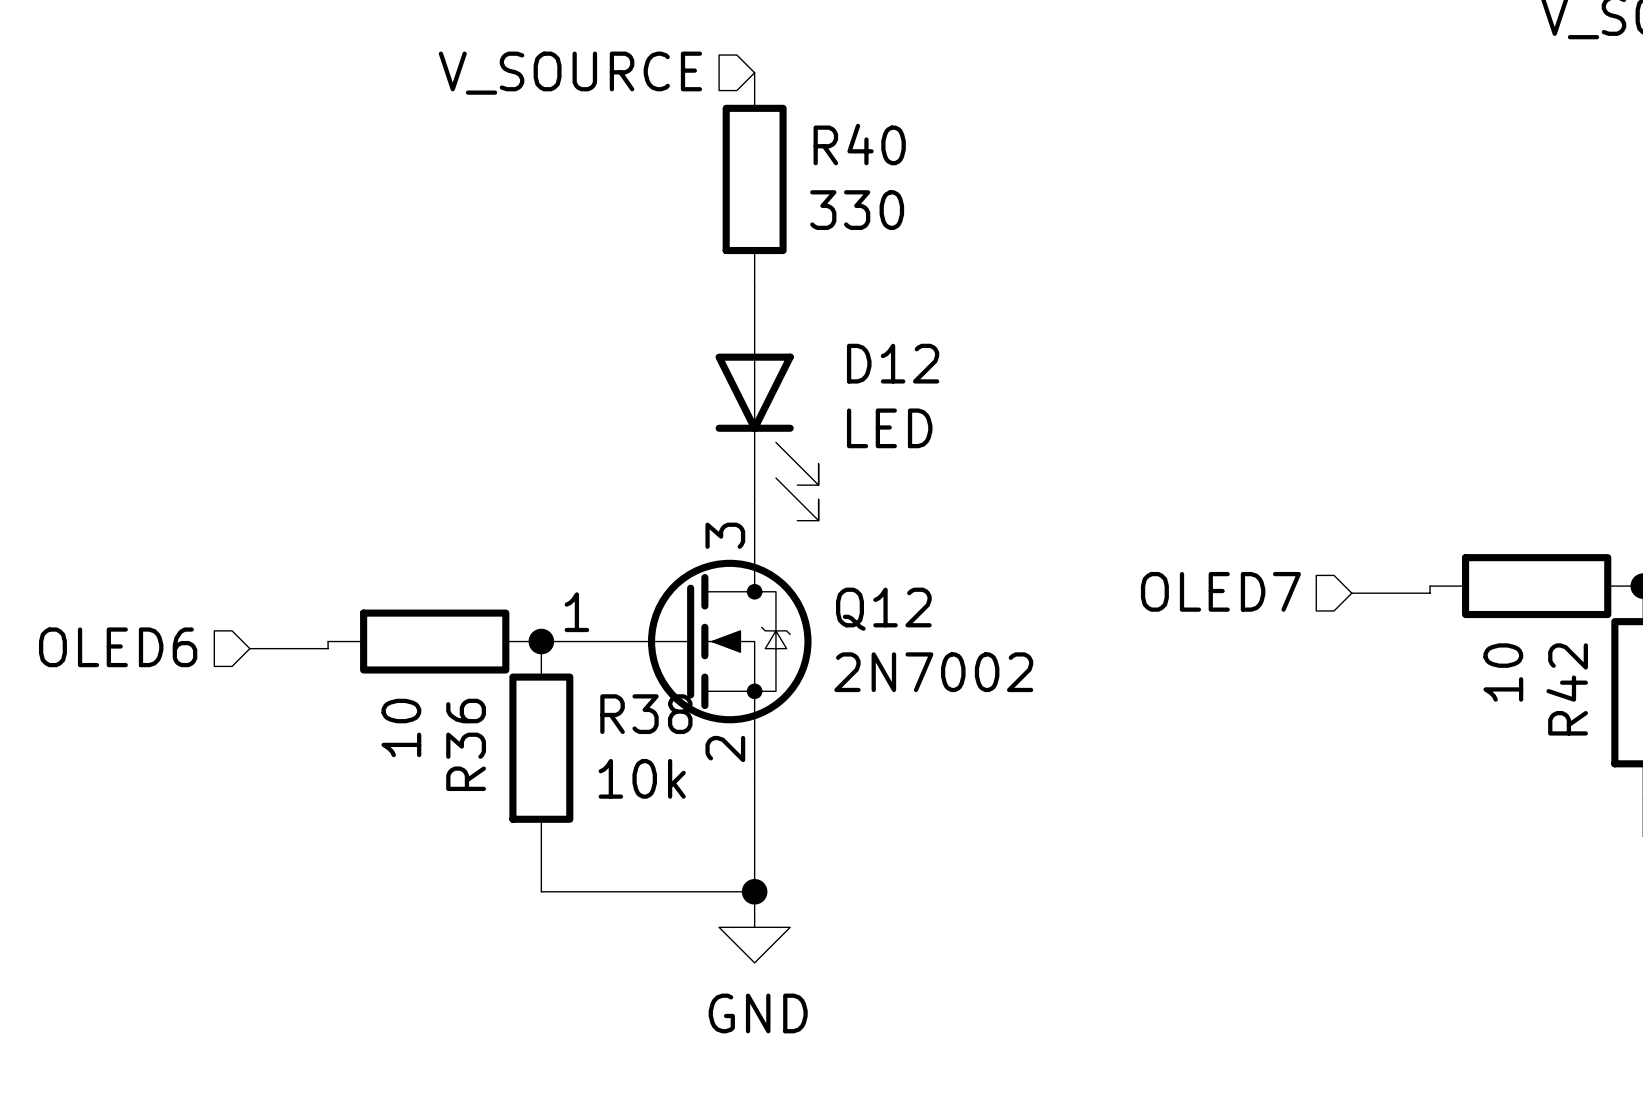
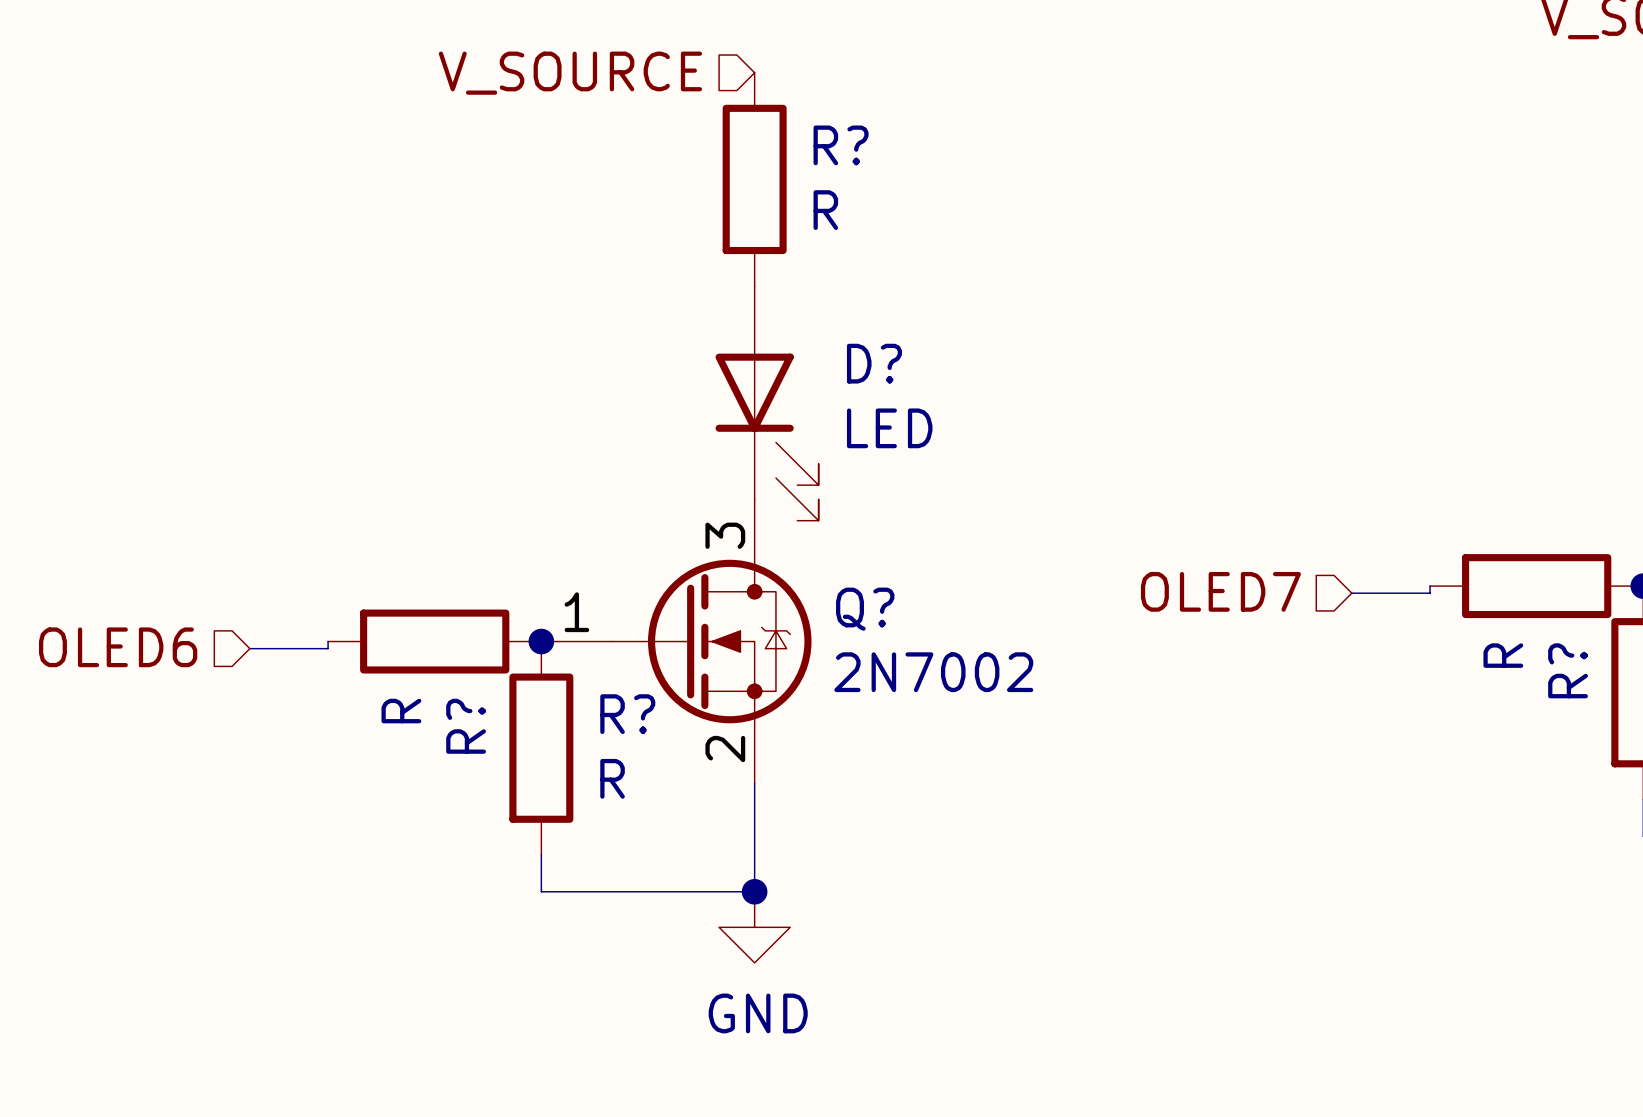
R40 name: R40 (859, 144) -> R? (841, 145)
R40 value: 330 (857, 210) -> R (825, 210)
D12 name: D12 (893, 363) -> D? (874, 363)
Q12 name: Q12 (883, 609) -> Q? (865, 609)
R42 value: 10 (1503, 672) -> R (1503, 655)
R42 name: R42 (1567, 689) -> R? (1568, 670)
R38 name: R38 (646, 714) -> R? (627, 714)
R36 value: 10 (401, 727) -> R (401, 711)
R36 name: R36 (466, 744) -> R? (466, 726)
R38 value: 10k (642, 778) -> R (612, 778)

